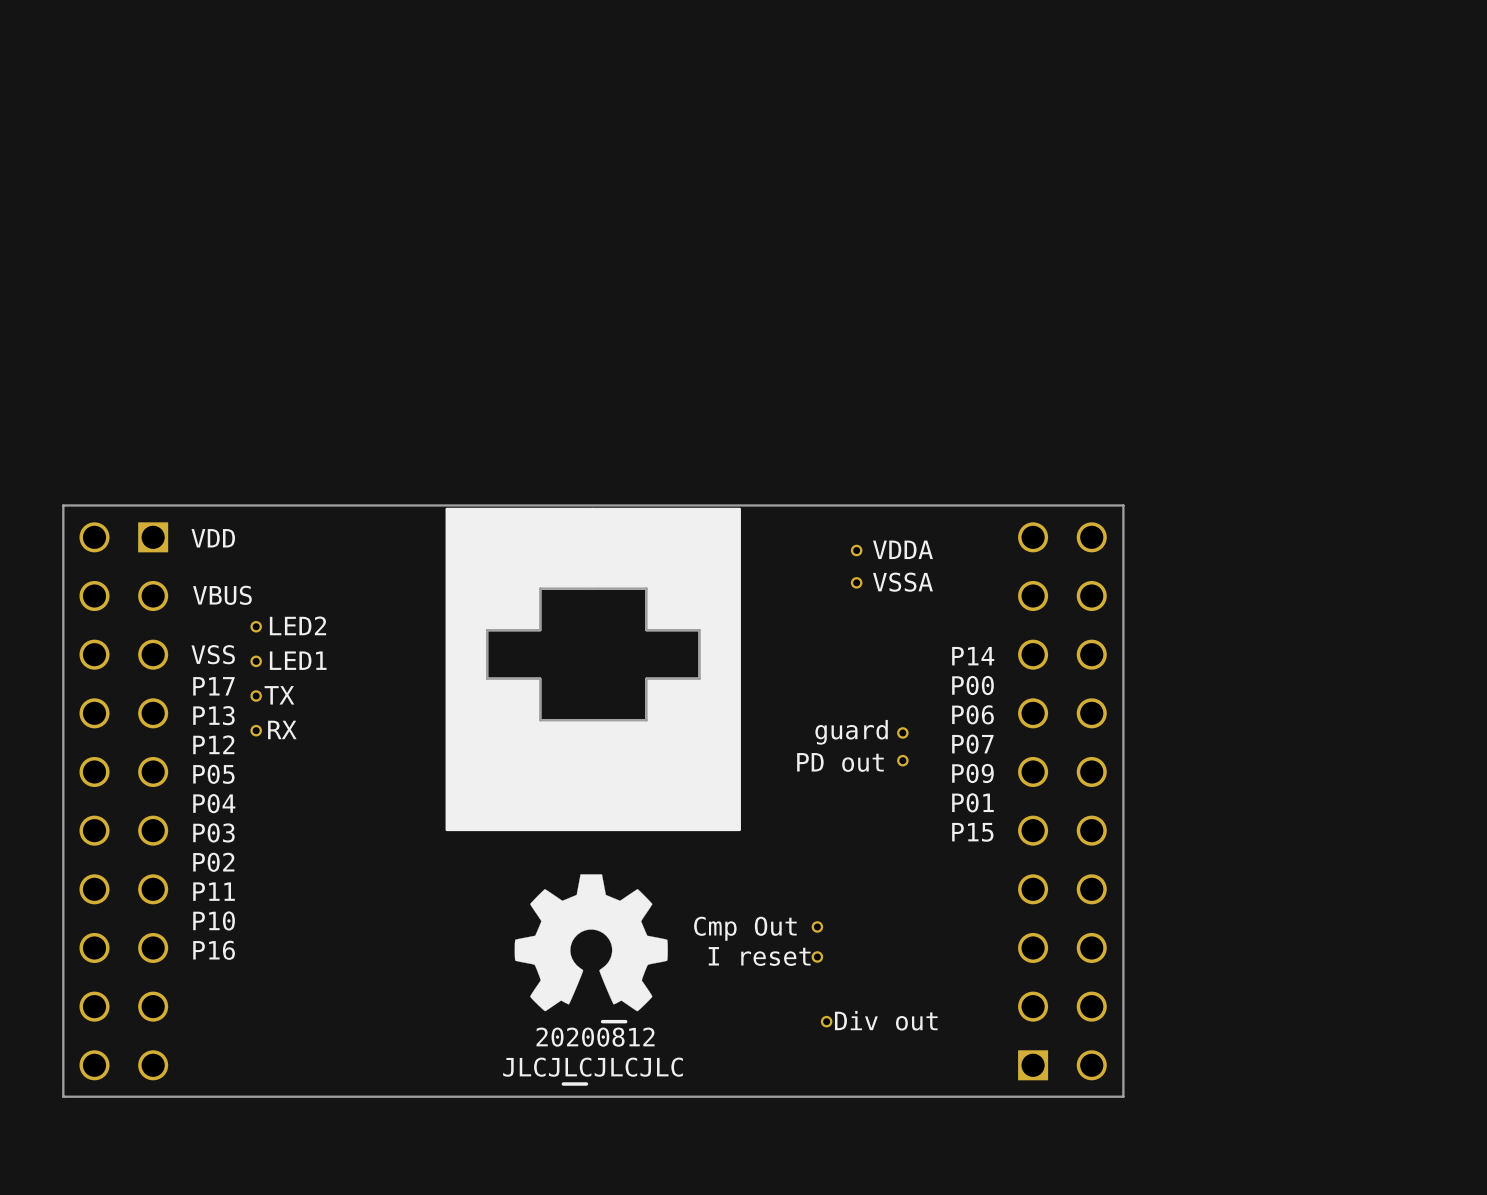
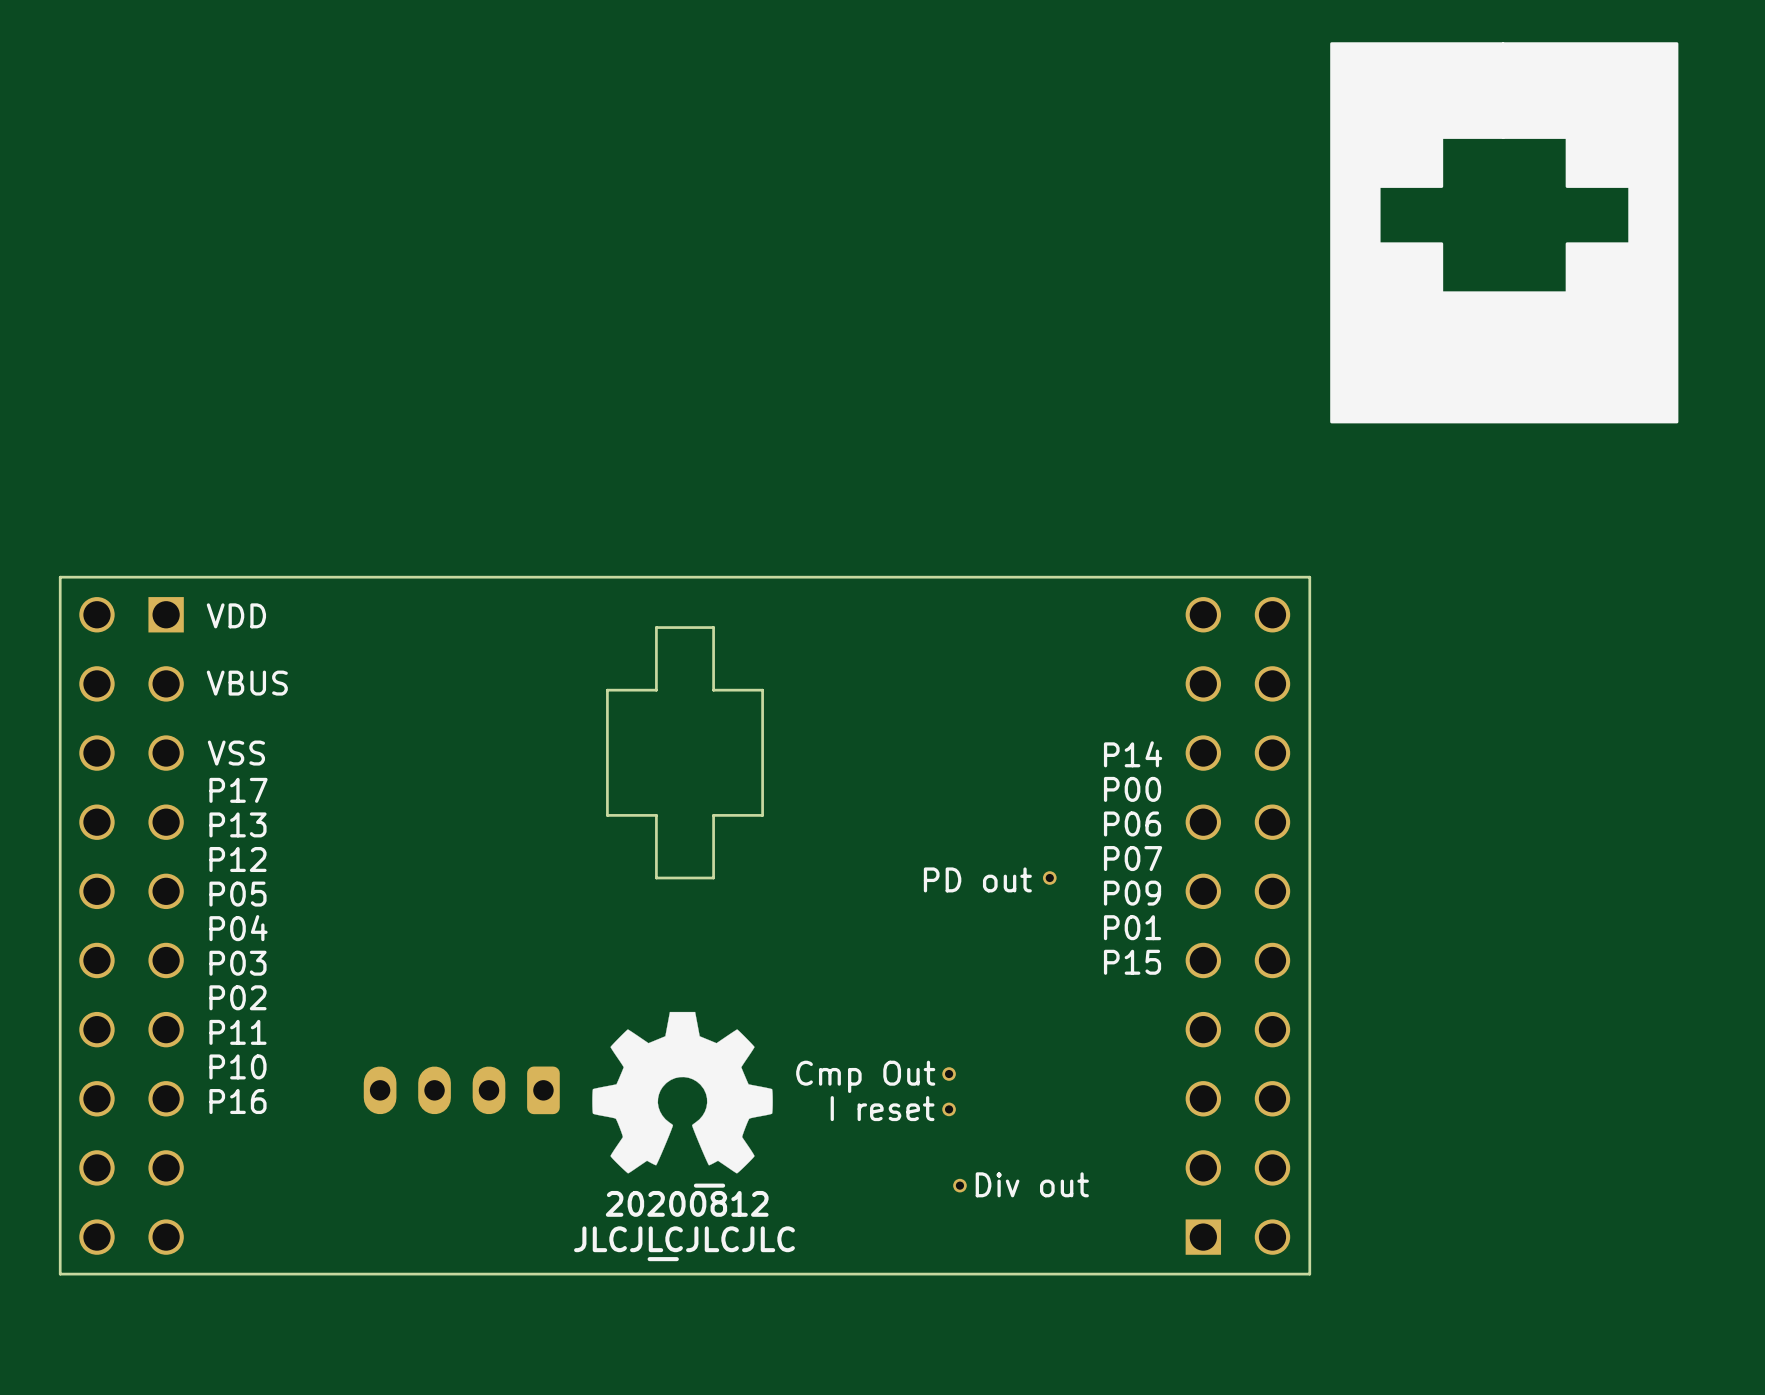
drawing: none -> [1330, 42, 1679, 424]
drawing: [445, 507, 741, 832] -> none
board edge: none -> (656, 627) (656, 690) (607, 690) (607, 815) (656, 815) (656, 878) (713, 878) (713, 815) (762, 815) (762, 690) (713, 690) (713, 627) (656, 627)
part: VDDA (856, 550) -> none
part: VSSA (856, 582) -> none
board edge: (540, 588) (540, 630) (487, 630) (487, 678) (540, 678) (540, 720) (646, 720) (646, 678) (699, 678) (699, 630) (646, 630) (646, 588) (540, 588) -> none
part: LED2 (256, 626) -> none
part: LED1 (256, 661) -> none
part: TX (256, 696) -> none
part: RX (256, 730) -> none
part: guard (902, 732) -> none
part: none -> (461, 1090)

